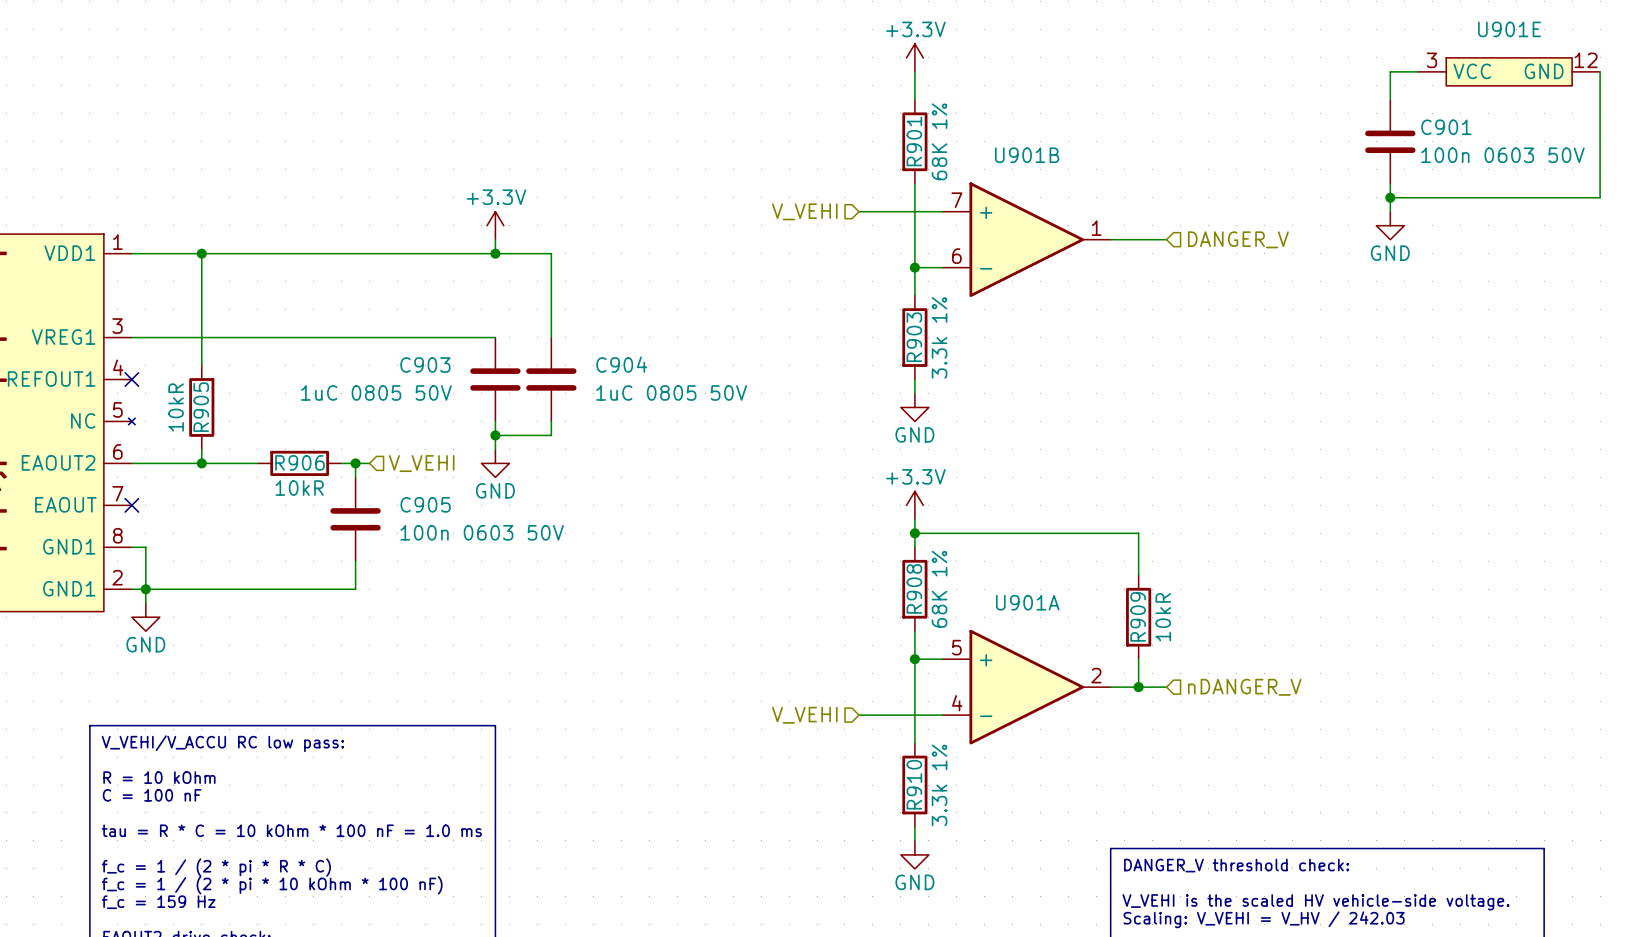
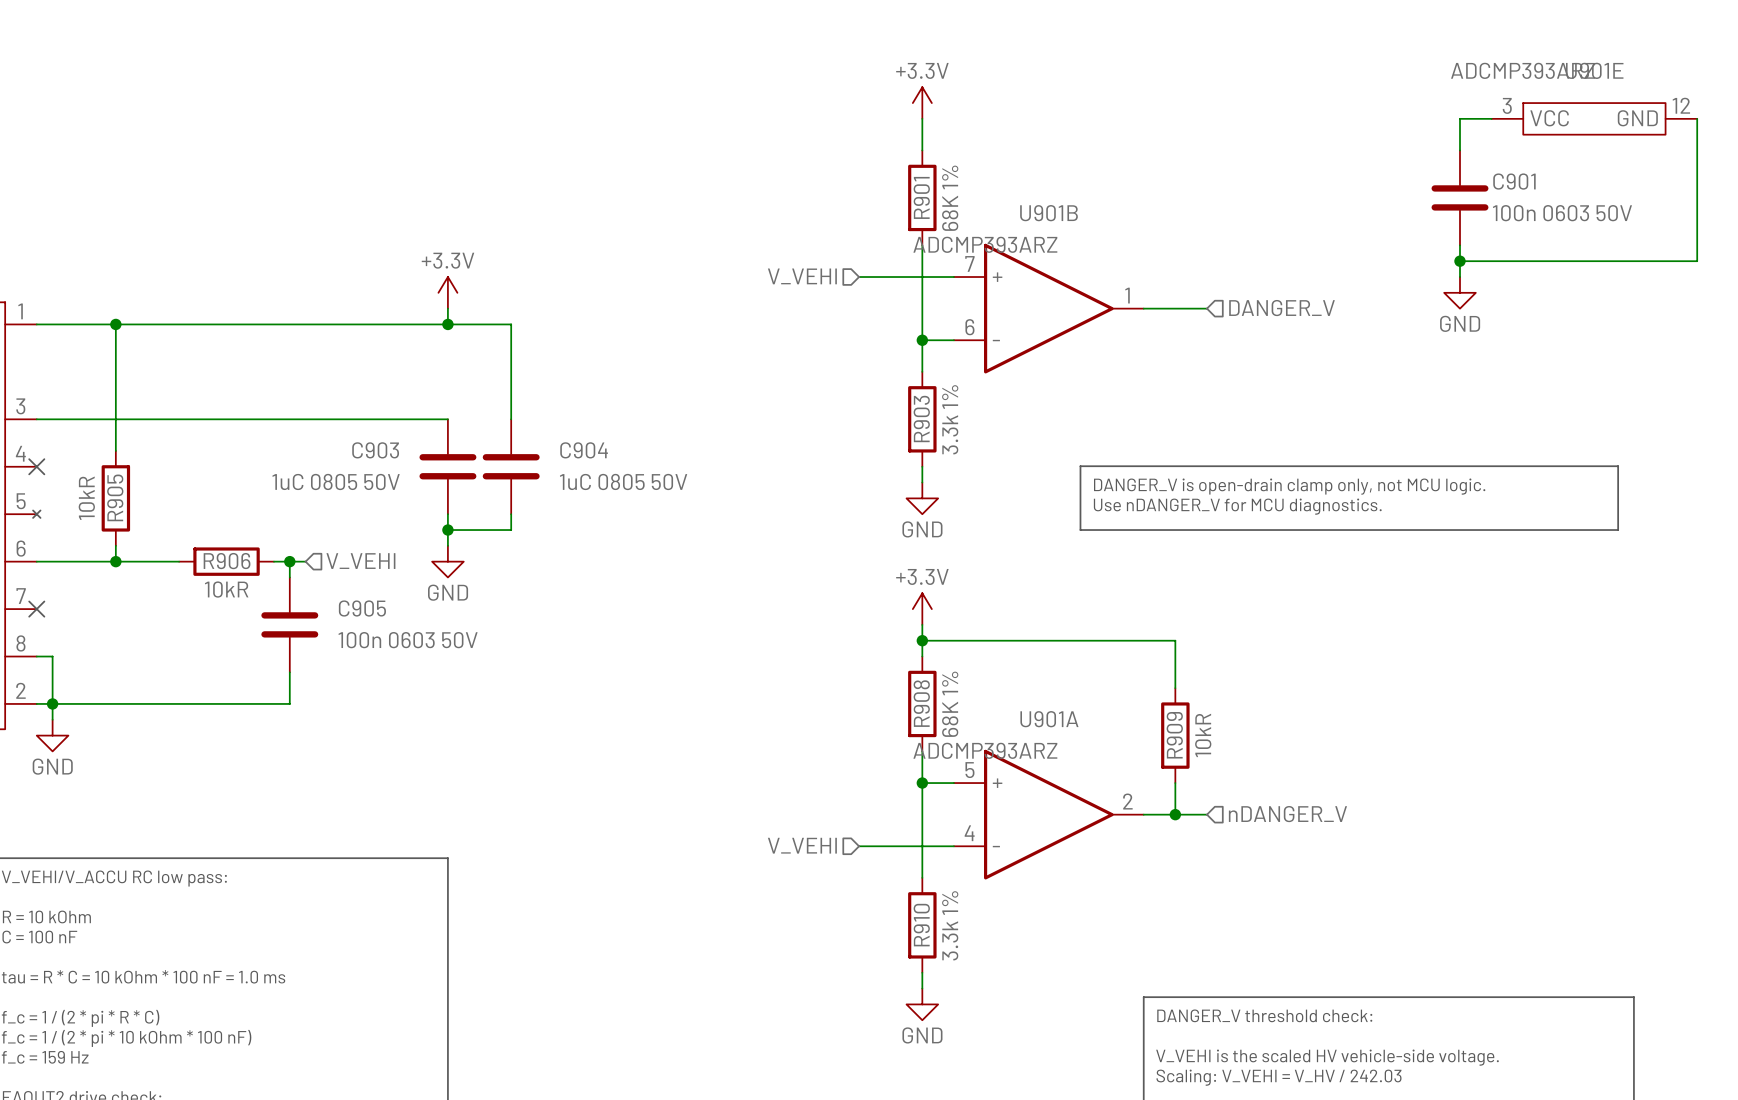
U901E value: none -> ADCMP393ARZ (1523, 70)
U901B value: none -> ADCMP393ARZ (985, 244)
line: none -> (1080, 466) (1618, 466) (1618, 530) (1080, 530) (1080, 466)
text: none -> DANGER_V is open-drain clamp only, not MCU logic. (1289, 486)
text: none -> Use nDANGER_V for MCU diagnostics. (1237, 506)
U901A value: none -> ADCMP393ARZ (985, 750)

